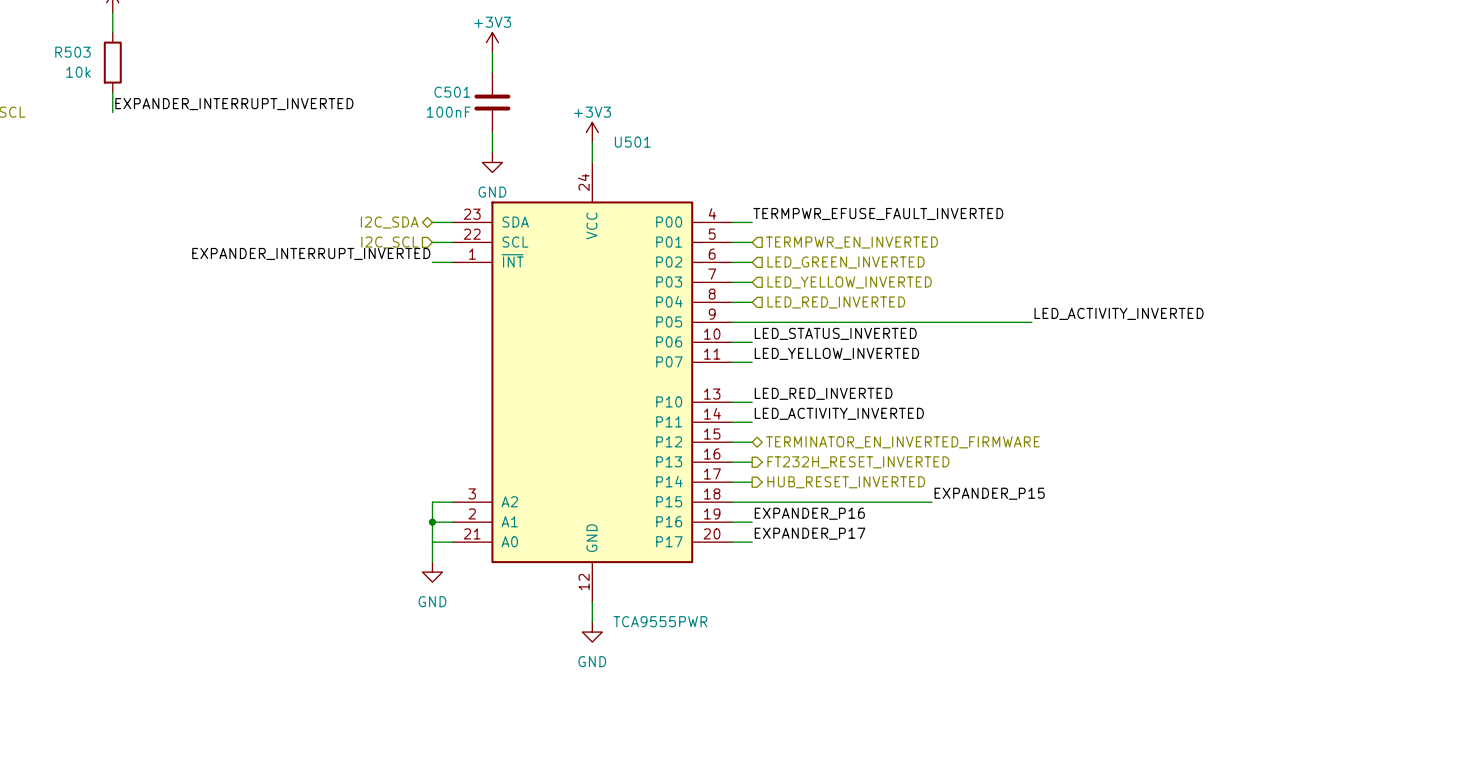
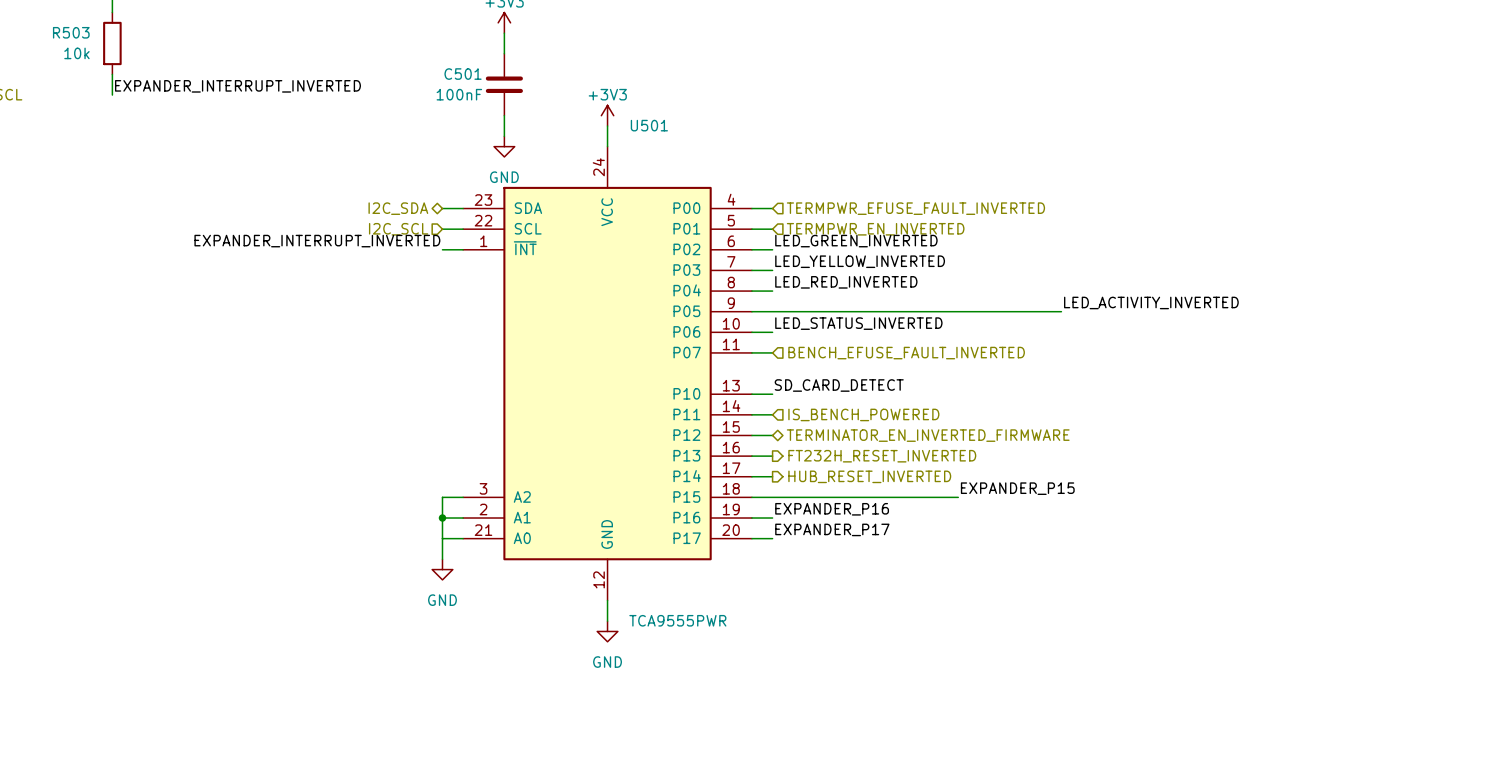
label: TERMPWR_EFUSE_FAULT_INVERTED (878, 213) -> none
hierarchical label: none -> TERMPWR_EFUSE_FAULT_INVERTED (915, 208)
label: none -> LED_GREEN_INVERTED (856, 241)
hierarchical label: LED_GREEN_INVERTED (846, 262) -> none
hierarchical label: LED_YELLOW_INVERTED (849, 282) -> none
label: none -> LED_RED_INVERTED (846, 282)
hierarchical label: LED_RED_INVERTED (836, 302) -> none
label position: LED_YELLOW_INVERTED (836, 353) -> LED_YELLOW_INVERTED (860, 261)
hierarchical label: none -> BENCH_EFUSE_FAULT_INVERTED (906, 353)
label: LED_RED_INVERTED (823, 393) -> SD_CARD_DETECT (839, 385)
label: LED_ACTIVITY_INVERTED (839, 413) -> none
hierarchical label: none -> IS_BENCH_POWERED (863, 414)

